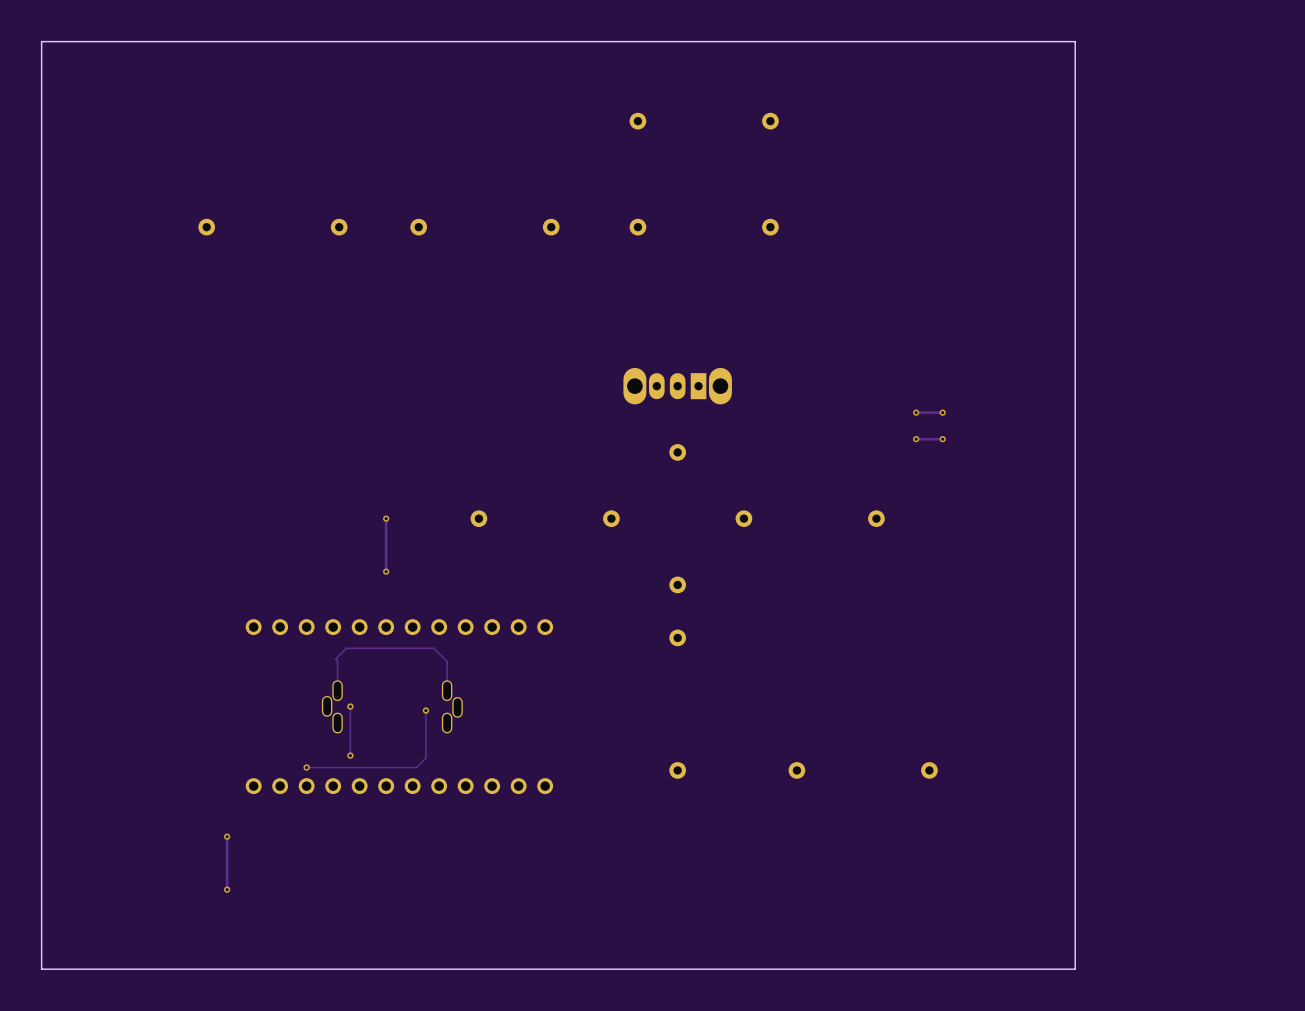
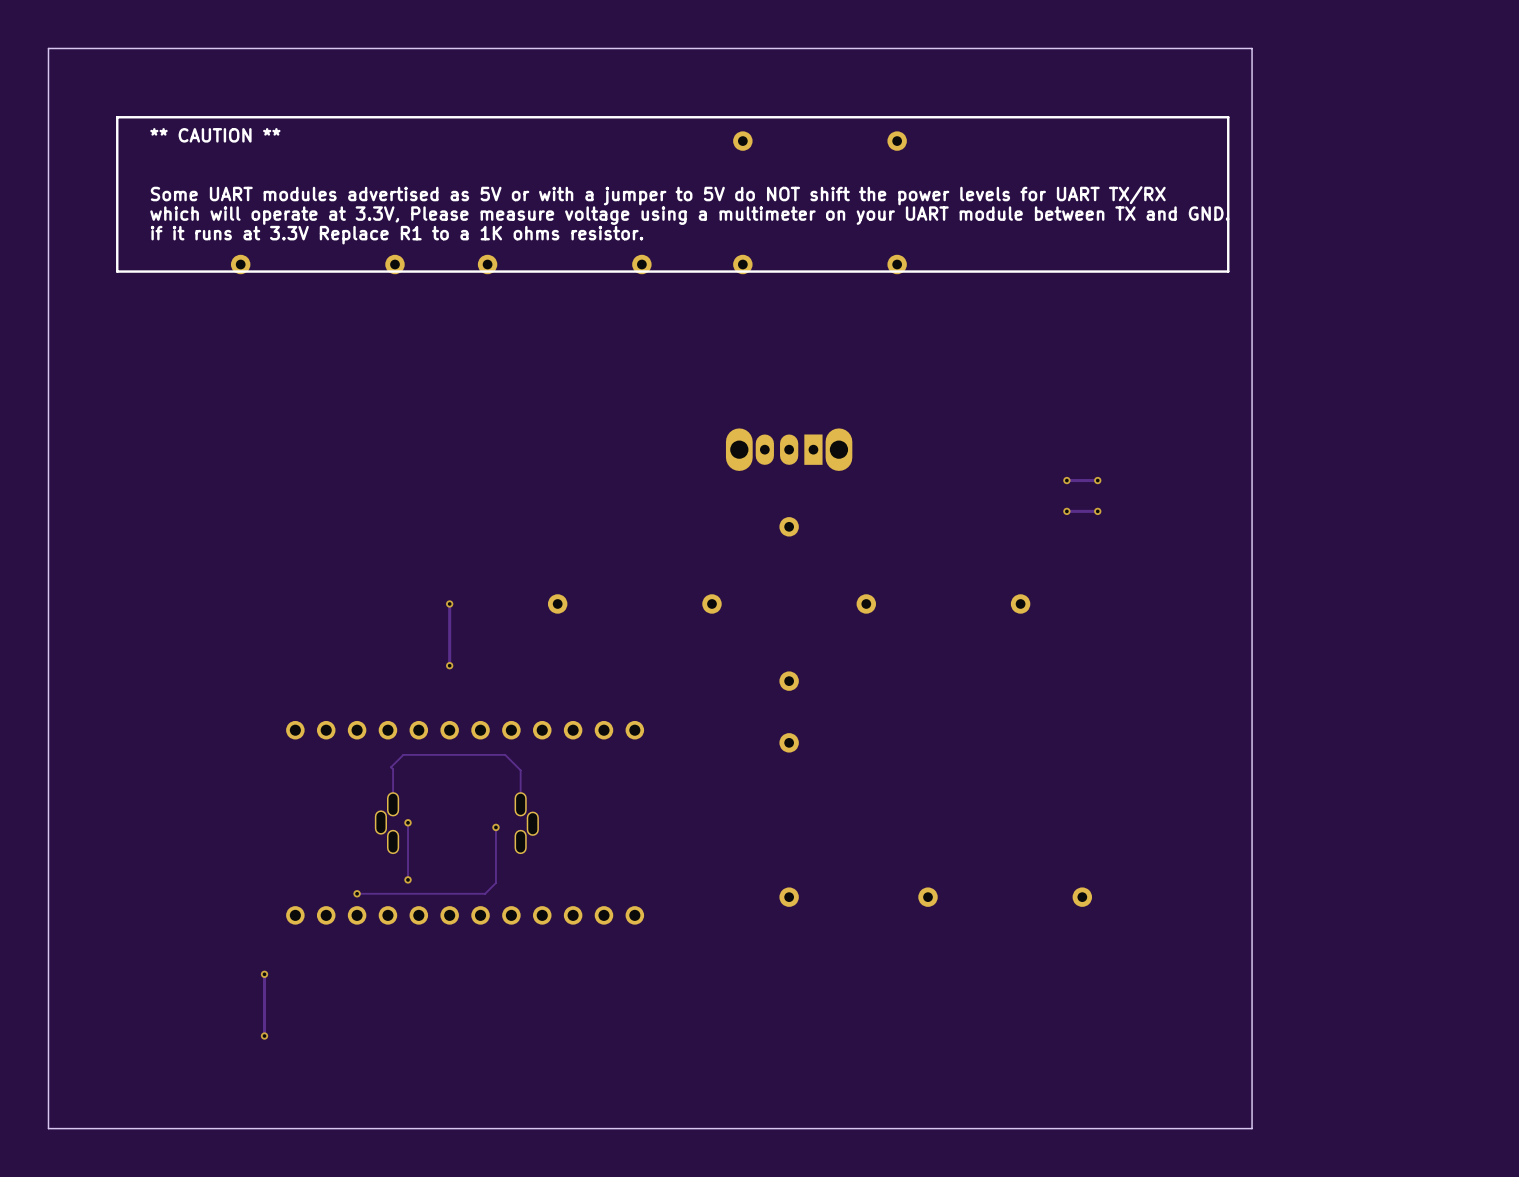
line: none -> (1228, 117) (117, 117) (117, 271) (1228, 271) (1228, 117)
text: none -> ** CAUTION ** (215, 135)
text: none -> Some UART modules advertised as 5V or with a jumper to 5V do NOT shift the power levels for UART TX/RX (658, 195)
text: none -> which will operate at 3.3V, Please measure voltage using a multimeter on your UART module between TX and GND. (689, 215)
text: none -> if it runs at 3.3V Replace R1 to a 1K ohms resistor. (397, 235)

